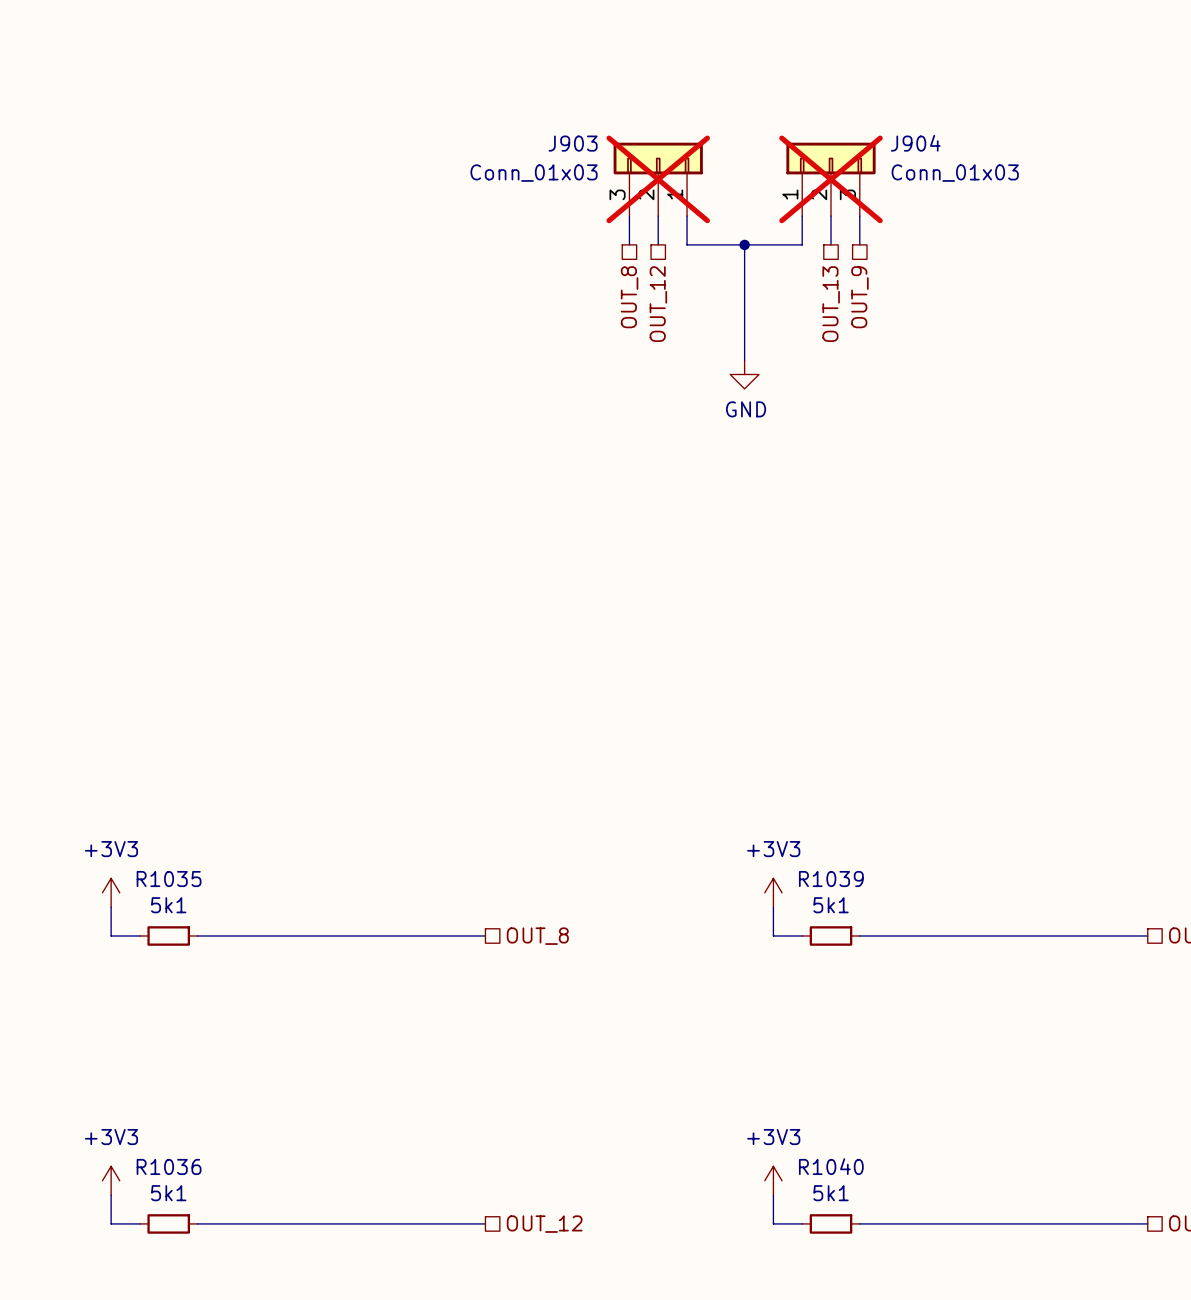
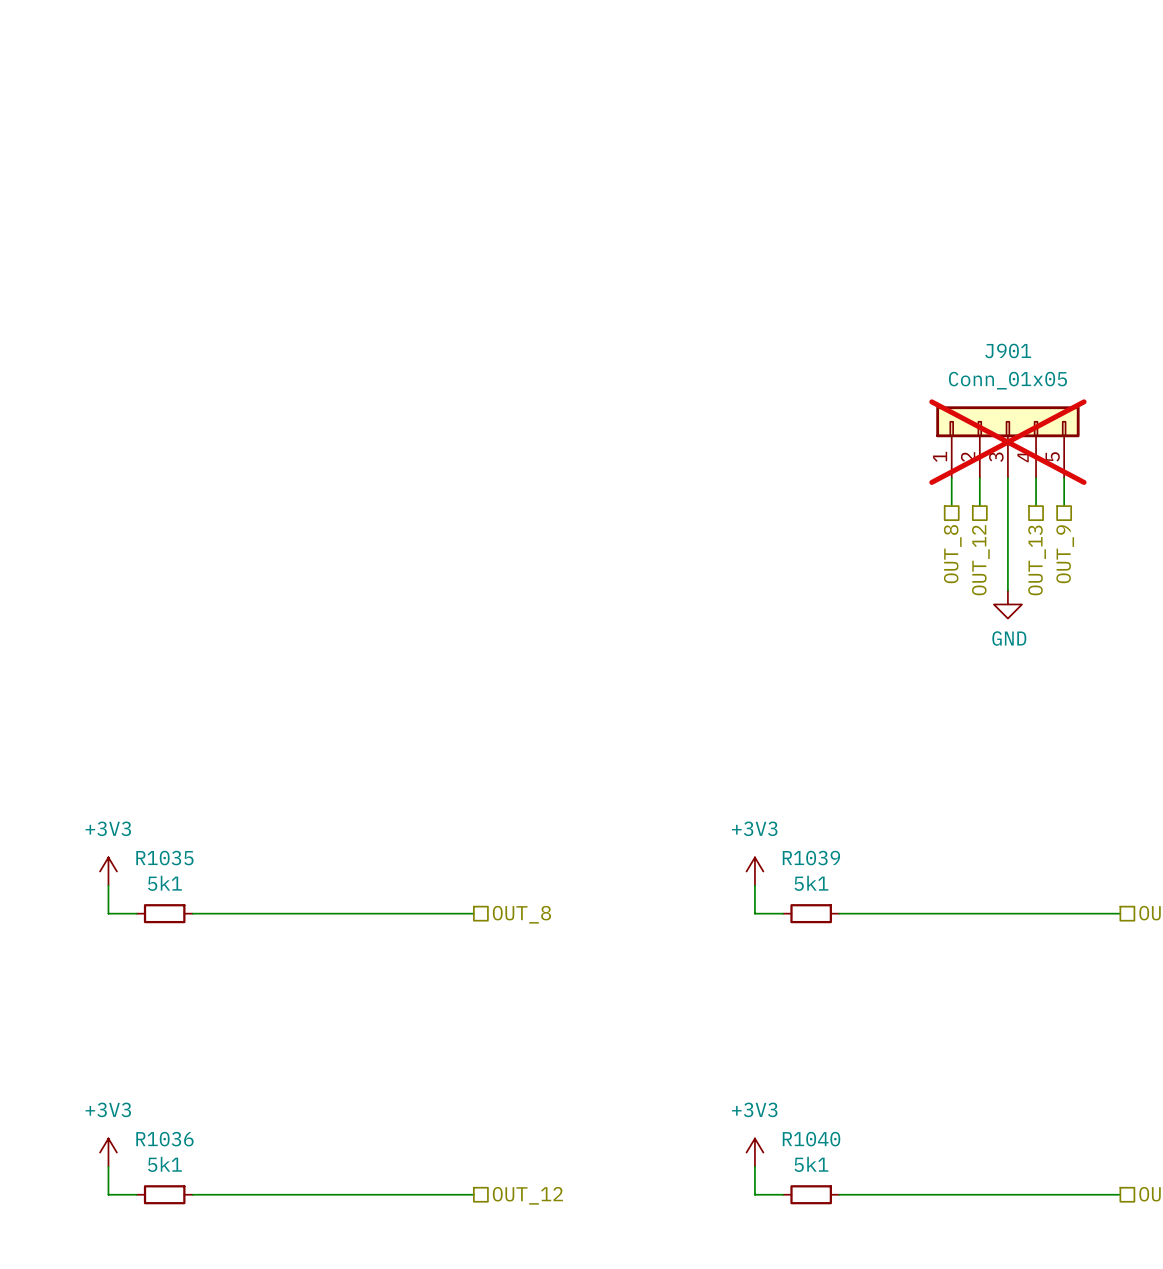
J903: Conn_01x03 (658, 179) -> none
J904: Conn_01x03 (831, 179) -> none
wire: (629, 216) (629, 244) -> none
wire: (658, 216) (658, 244) -> none
wire: (687, 216) (687, 244) (802, 244) (802, 216) -> none
wire: (831, 216) (831, 244) -> none
wire: (859, 216) (859, 244) -> none
wire: (744, 244) (744, 360) -> none
junction: (744, 244) -> none
hierarchical label: OUT_8 (629, 297) -> none
hierarchical label: OUT_9 (859, 297) -> none
hierarchical label: OUT_12 (658, 304) -> none
hierarchical label: OUT_13 (831, 304) -> none
power symbol: GND (744, 374) -> none
J901: none -> Conn_01x05 (1007, 442)
wire: none -> (951, 477) (951, 506)
wire: none -> (979, 477) (979, 506)
wire: none -> (1007, 477) (1007, 590)
wire: none -> (1036, 477) (1036, 506)
wire: none -> (1064, 477) (1064, 506)
hierarchical label: none -> OUT_8 (952, 554)
hierarchical label: none -> OUT_9 (1065, 554)
hierarchical label: none -> OUT_12 (980, 560)
hierarchical label: none -> OUT_13 (1037, 560)
power symbol: none -> GND (1007, 604)

